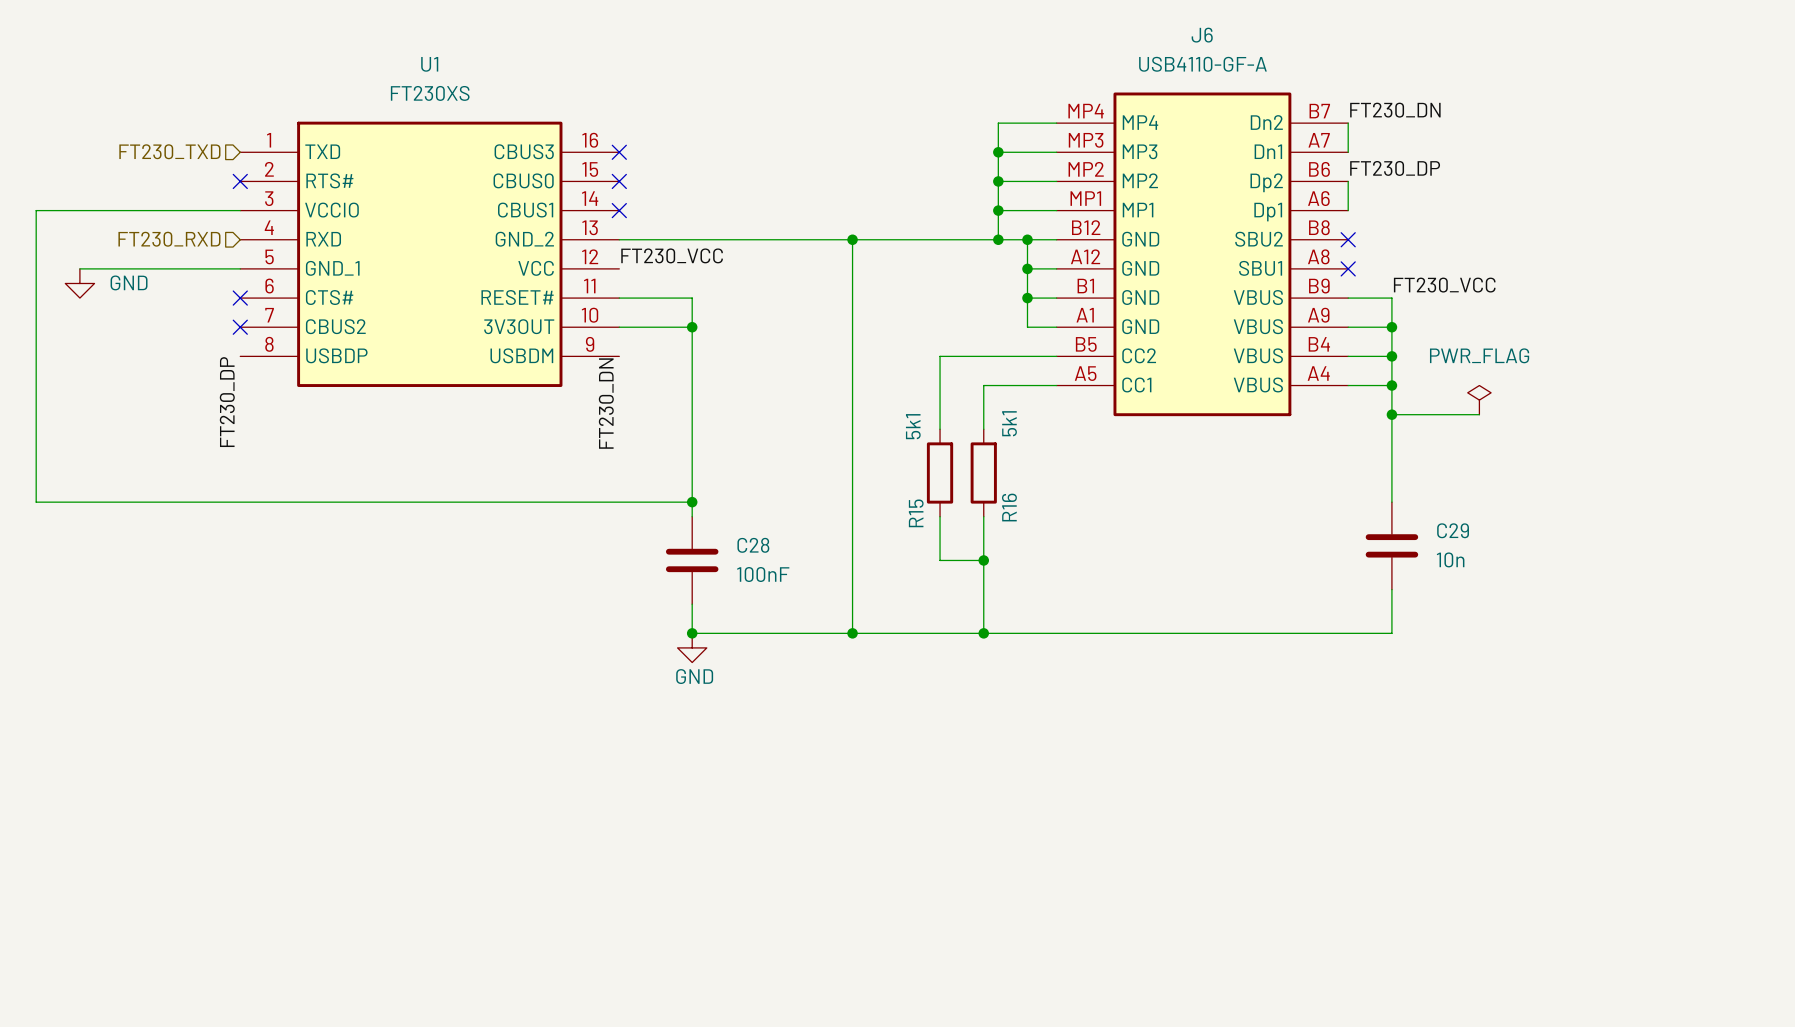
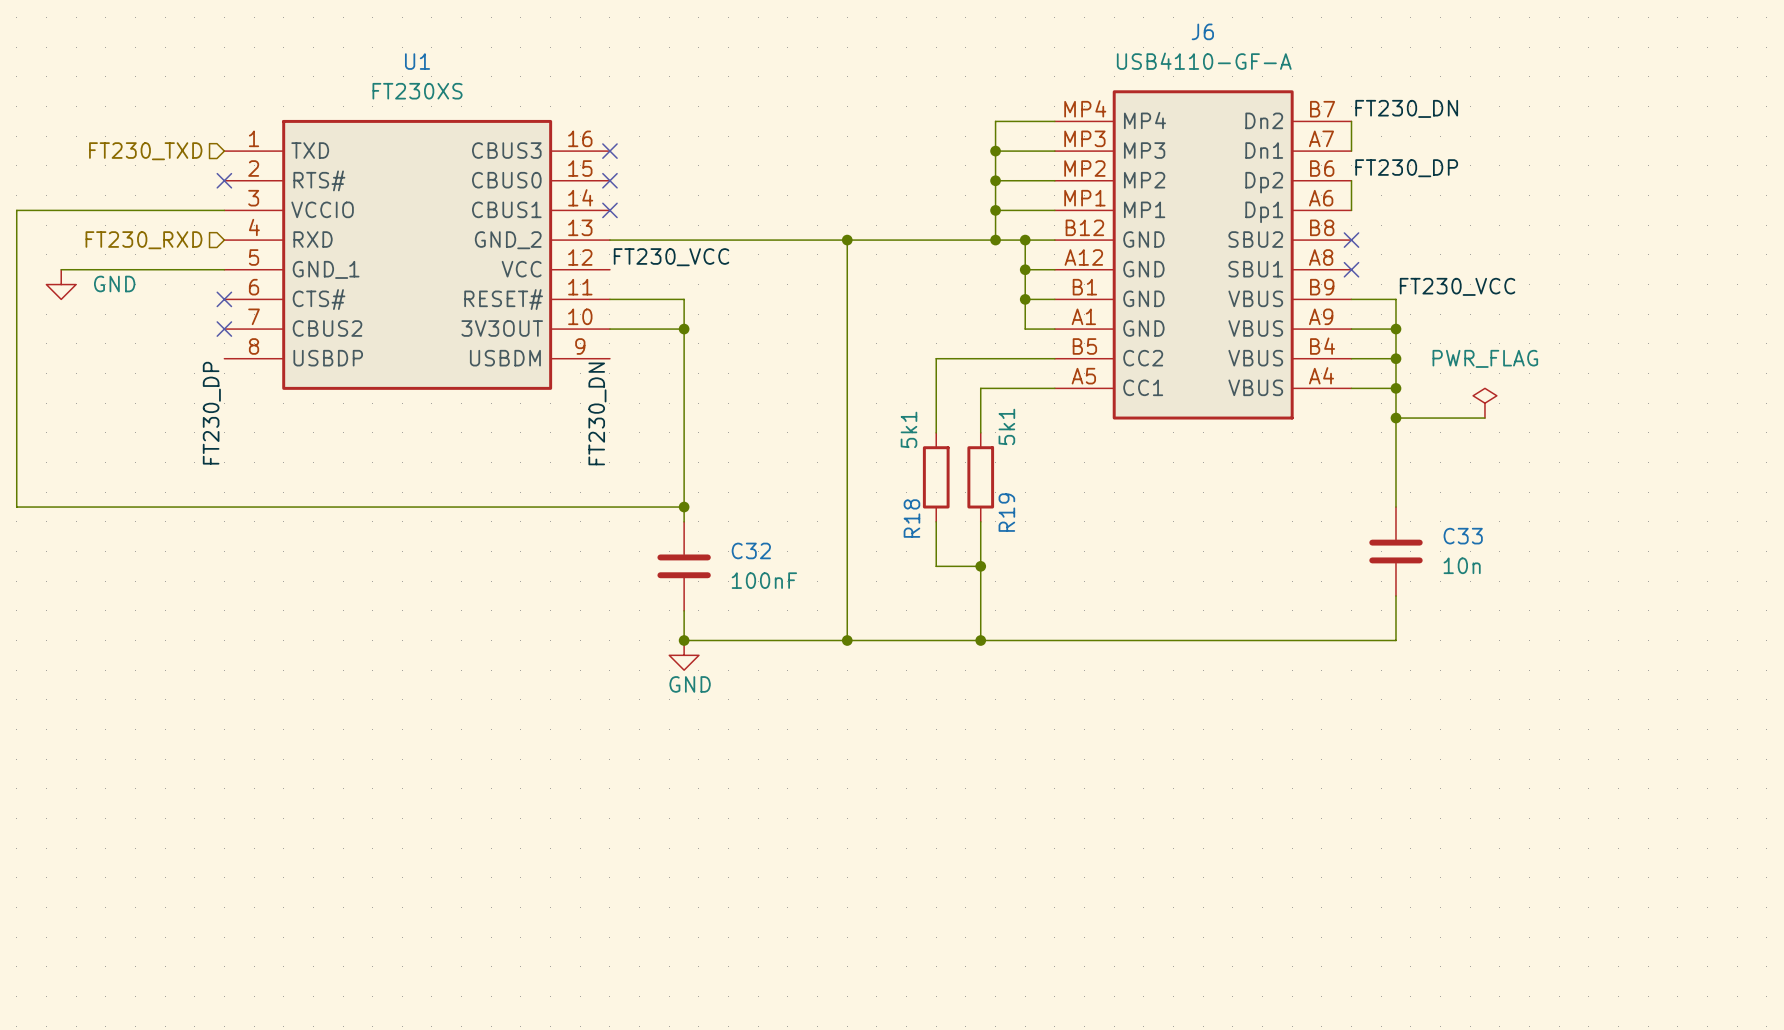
R16 name: R16 (1009, 507) -> R19 (1006, 512)
R15 name: R15 (916, 513) -> R18 (911, 518)
C29 name: C29 (1453, 530) -> C33 (1463, 536)
C28 name: C28 (753, 545) -> C32 (751, 550)

